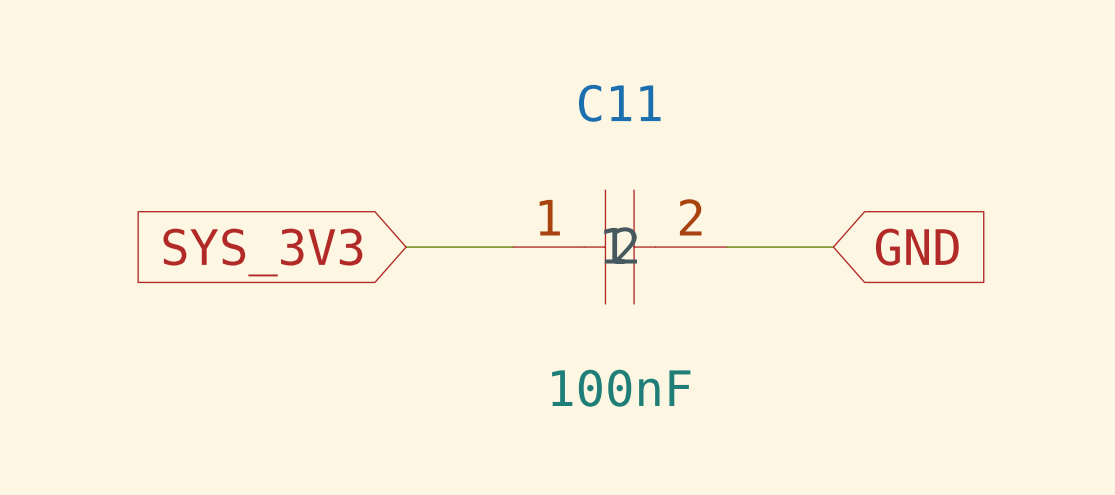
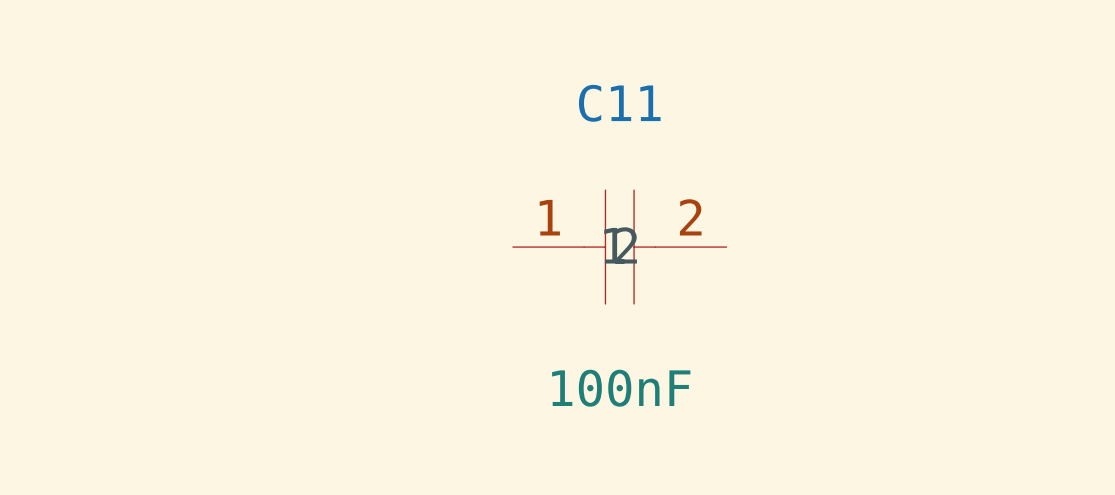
wire: (406, 247) (512, 247) -> none
wire: (726, 247) (833, 247) -> none
global label: GND (917, 247) -> none
global label: SYS_3V3 (262, 252) -> none

